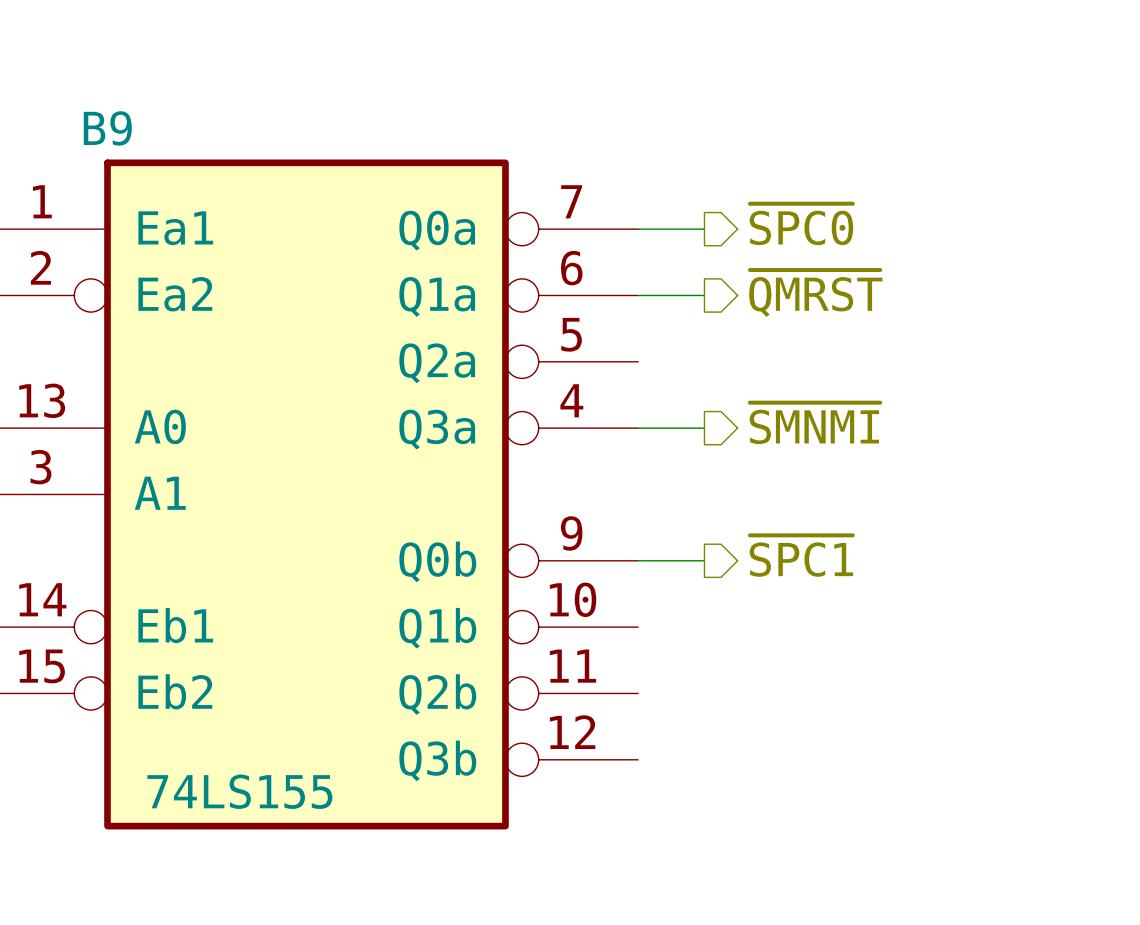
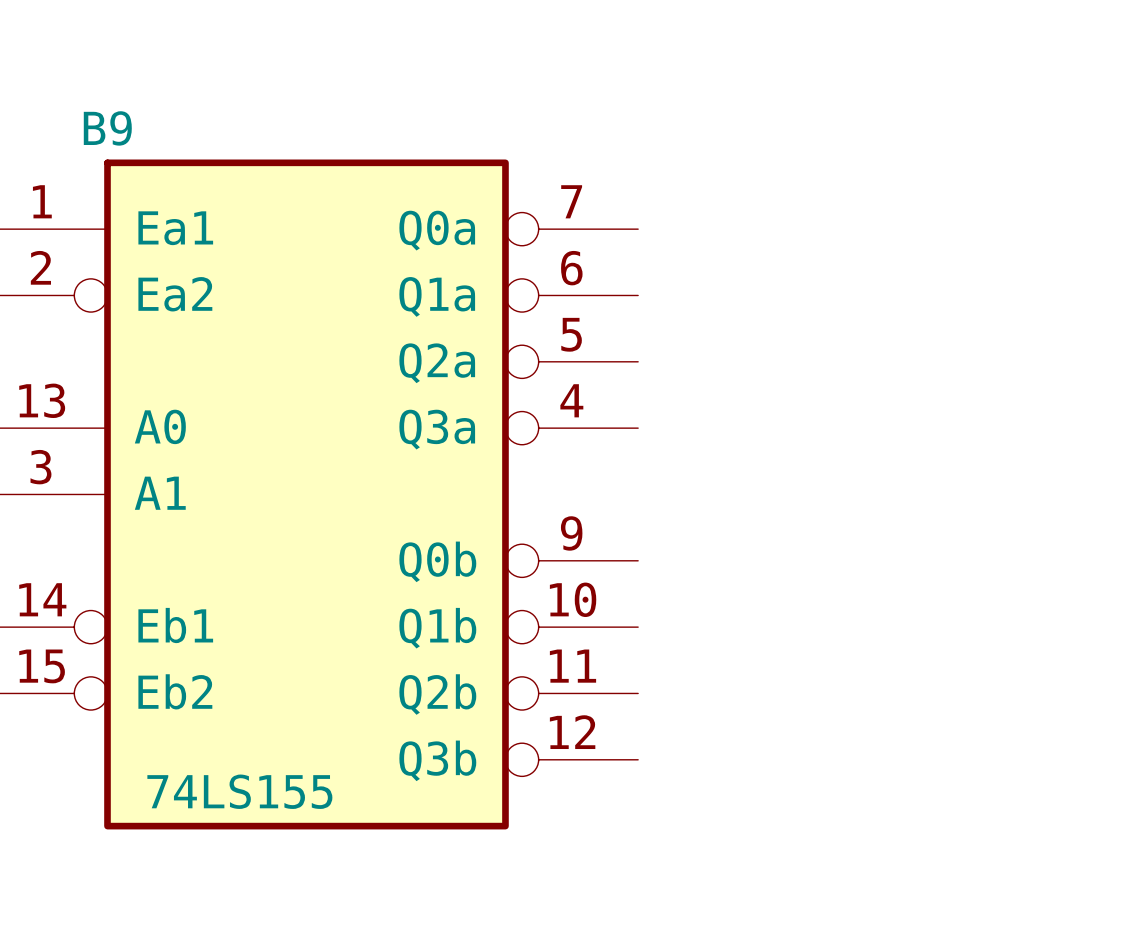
hierarchical label: ~{SPC0} (801, 224) -> none
wire: (638, 229) (704, 229) -> none
hierarchical label: ~{QMRST} (815, 293) -> none
wire: (638, 295) (704, 295) -> none
hierarchical label: ~{SMNMI} (814, 423) -> none
wire: (638, 428) (704, 428) -> none
hierarchical label: ~{SPC1} (801, 556) -> none
wire: (638, 560) (704, 560) -> none

